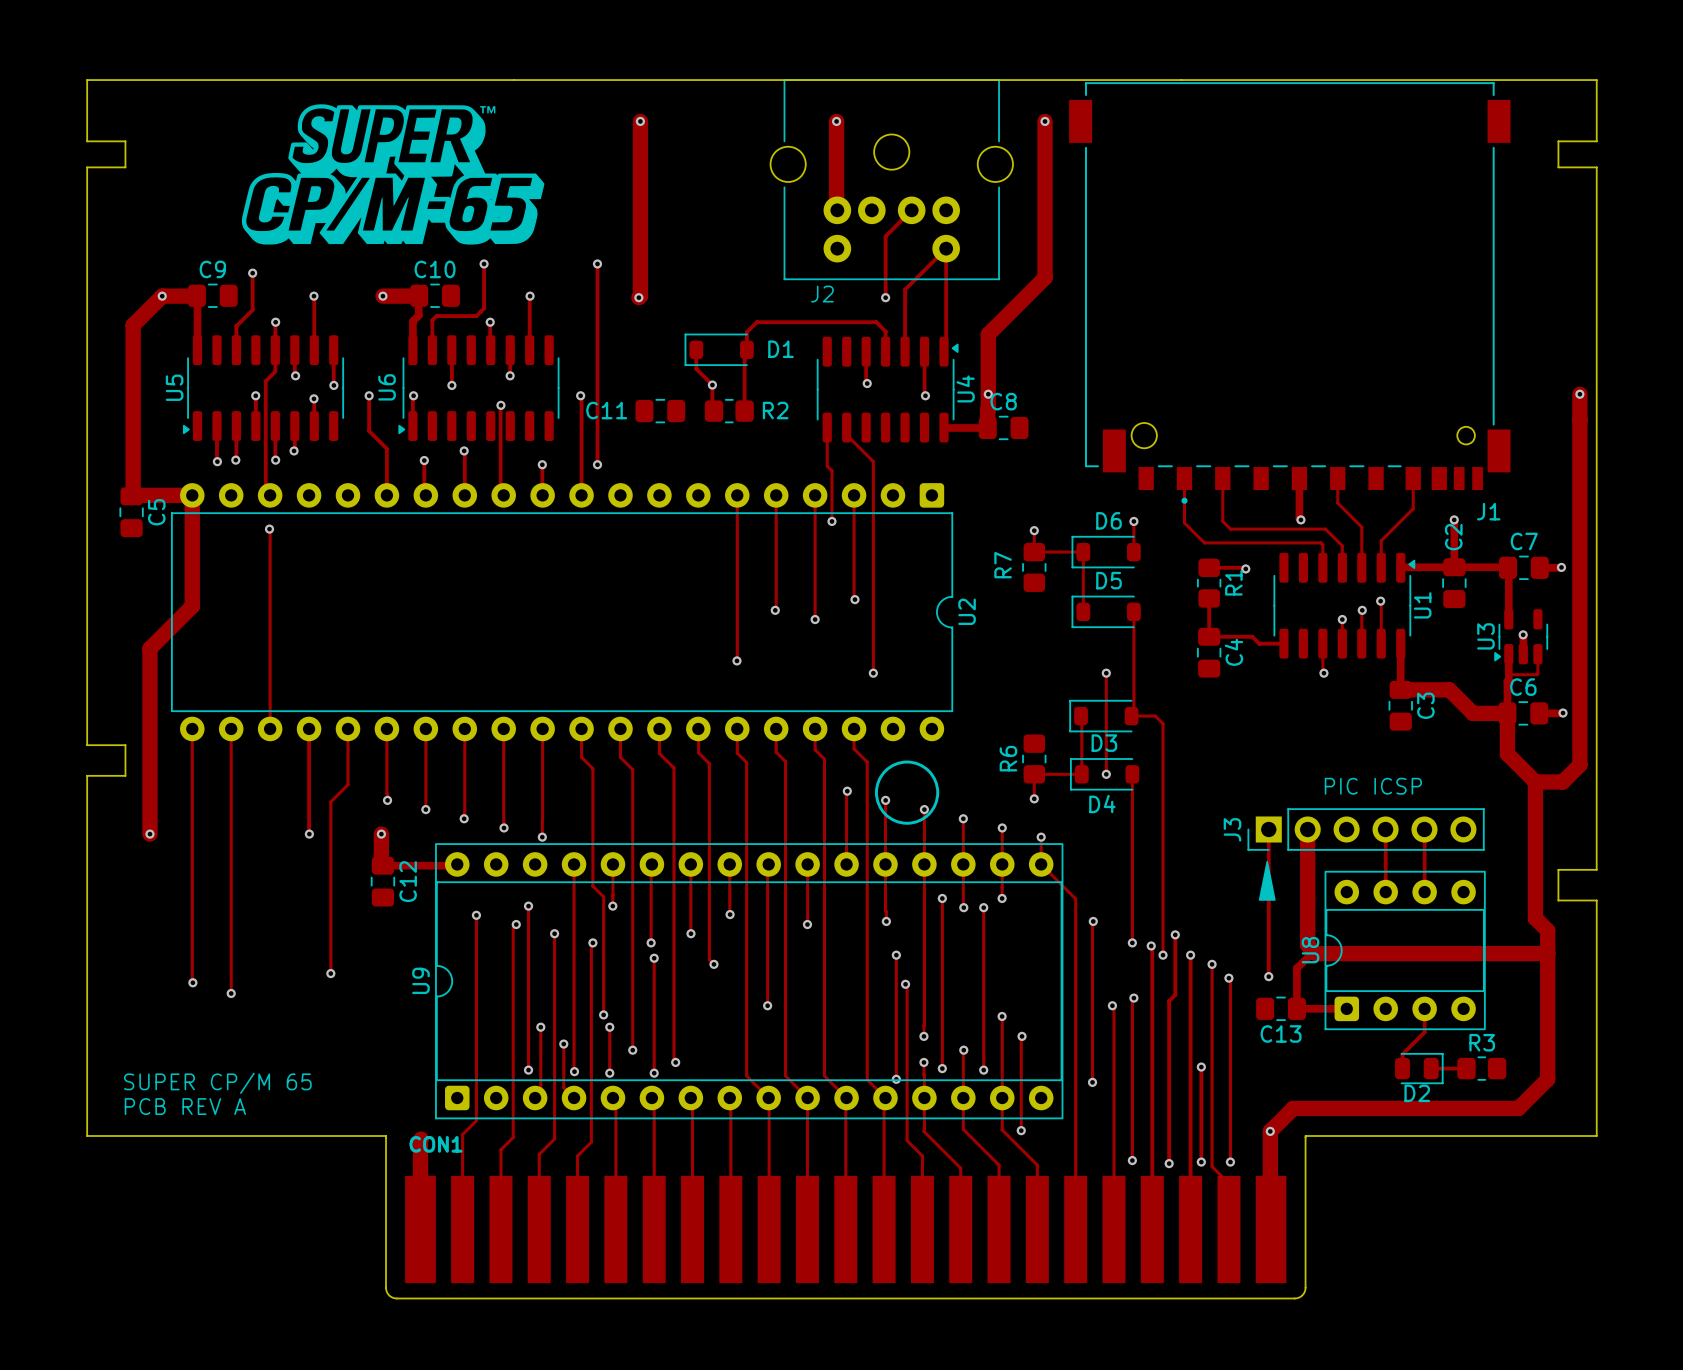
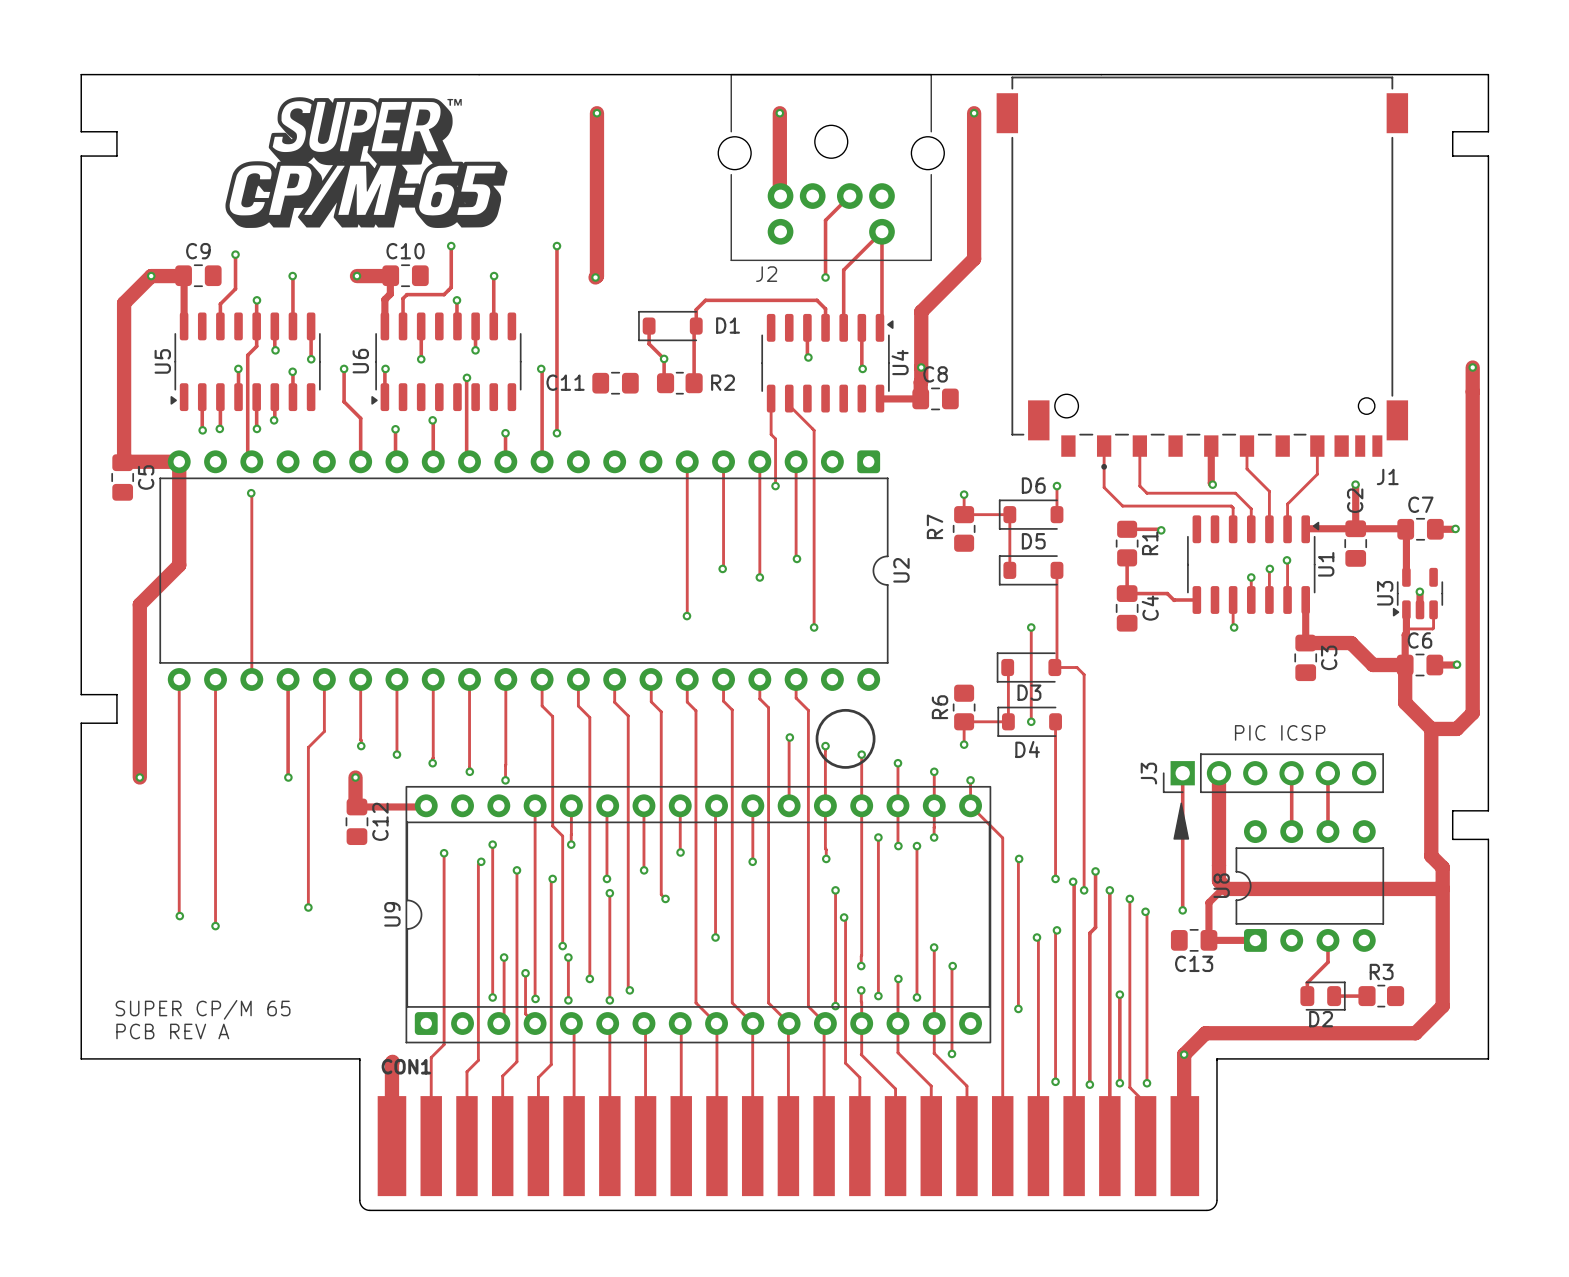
U8 footprint: [1324, 870, 1486, 1031] -> [1235, 820, 1385, 952]

